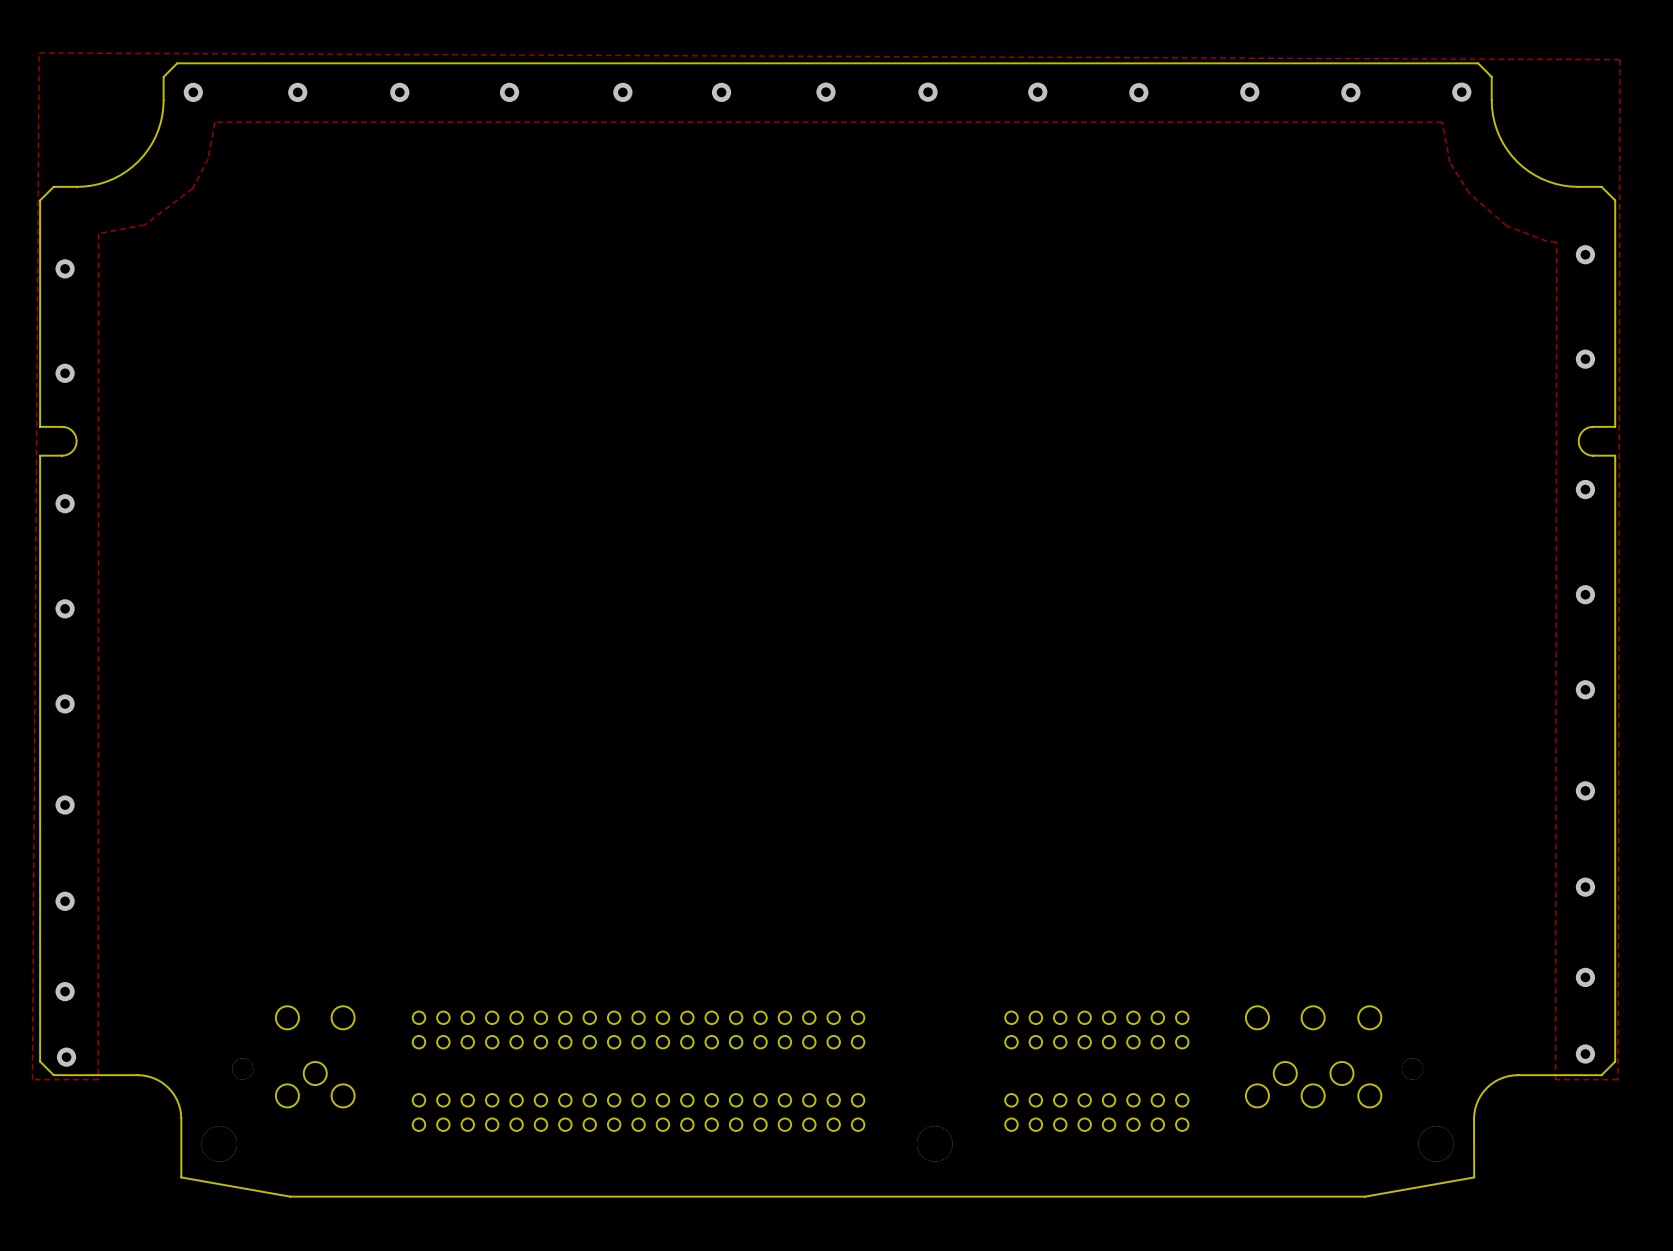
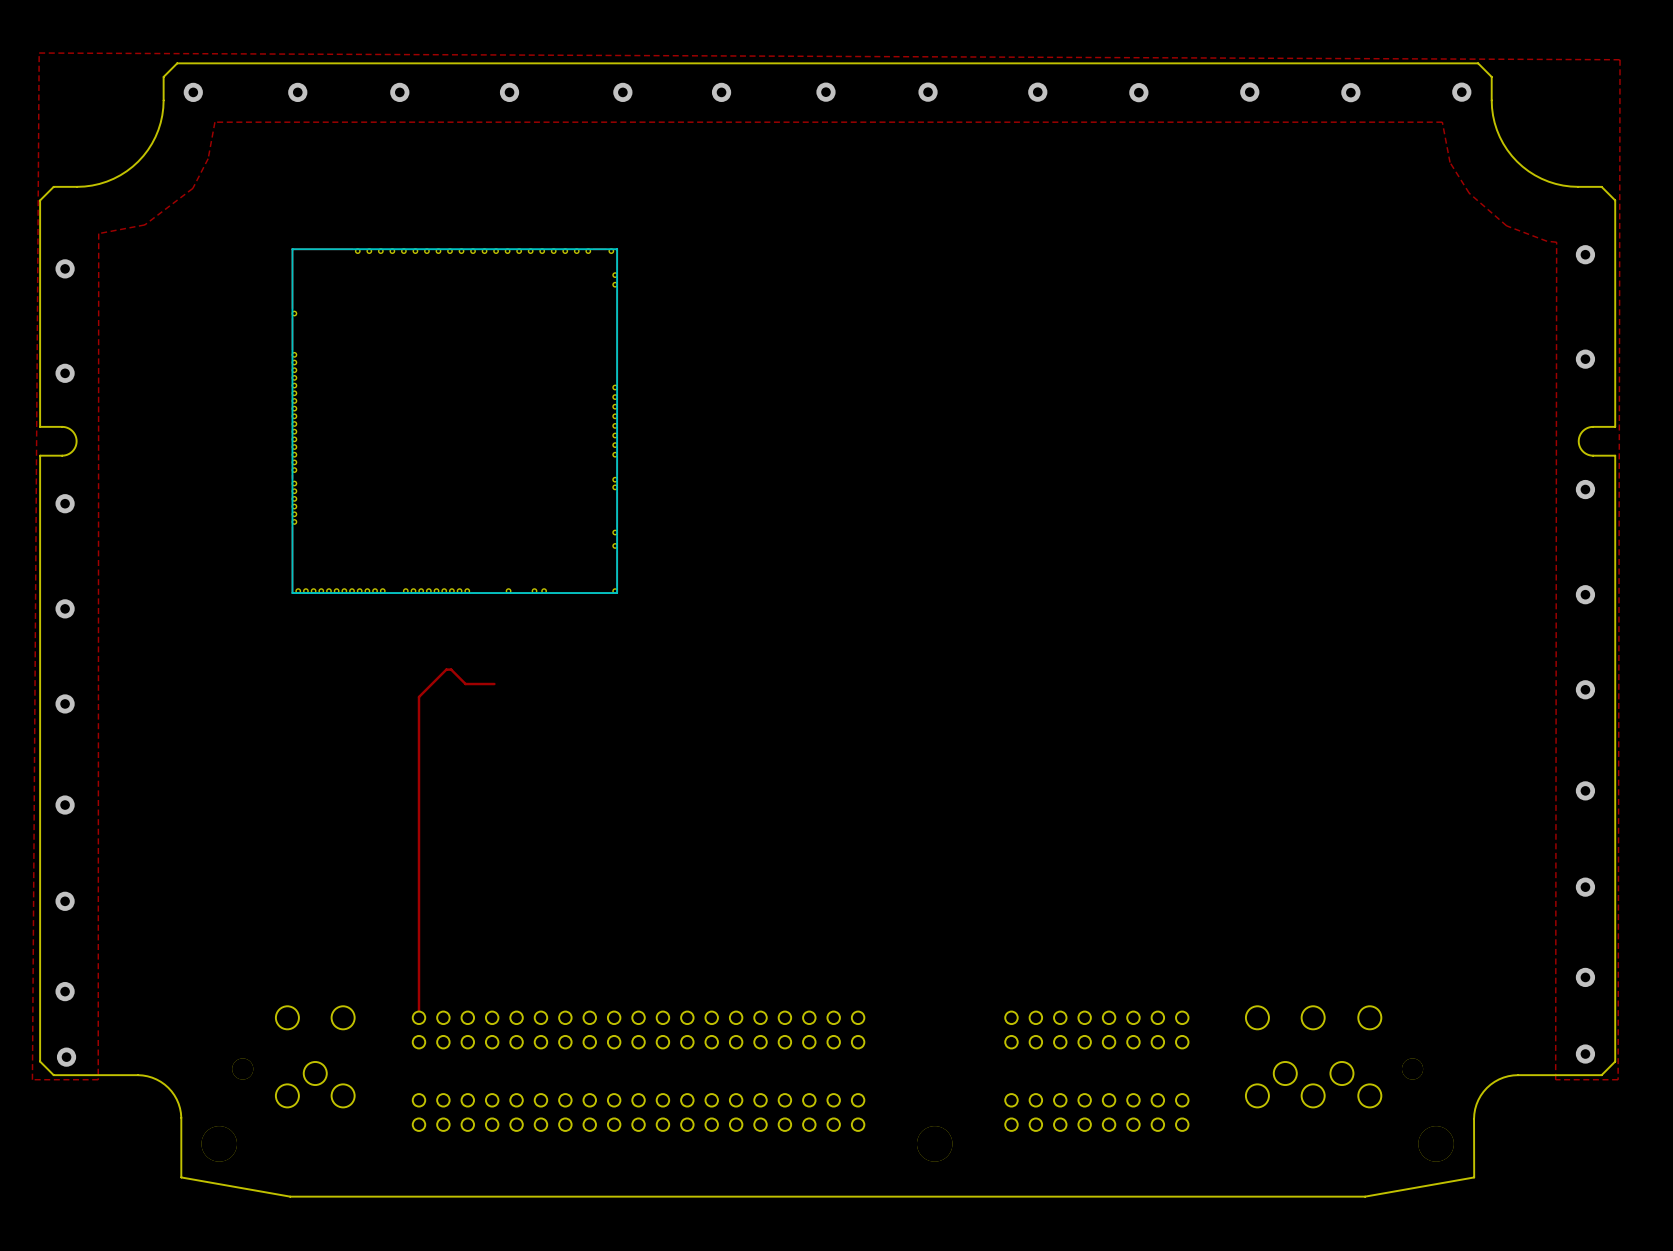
part: none -> (454, 421)
track: none -> (494, 684) (465, 684) (451, 669) (446, 669) (418, 697) (418, 1017)

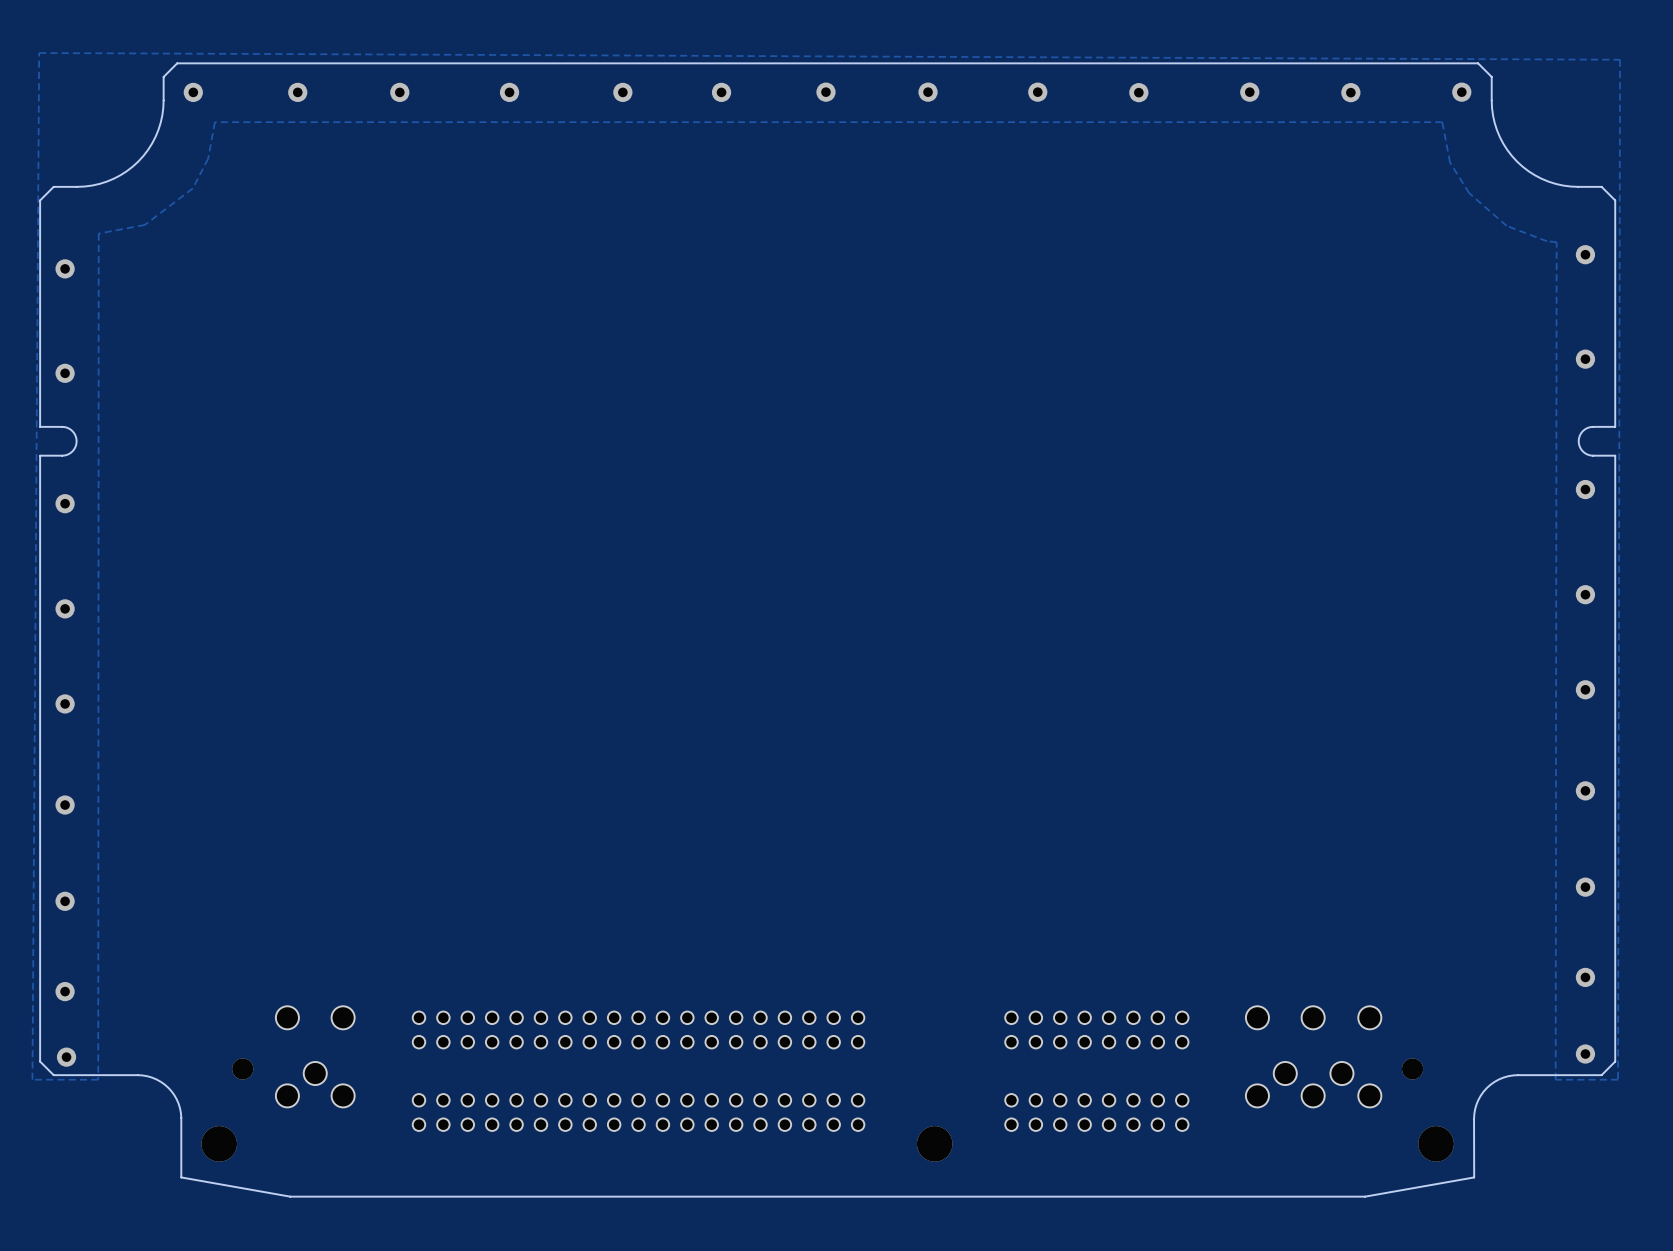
part: (454, 421) -> none
track: (494, 684) (465, 684) (451, 669) (446, 669) (418, 697) (418, 1017) -> none

